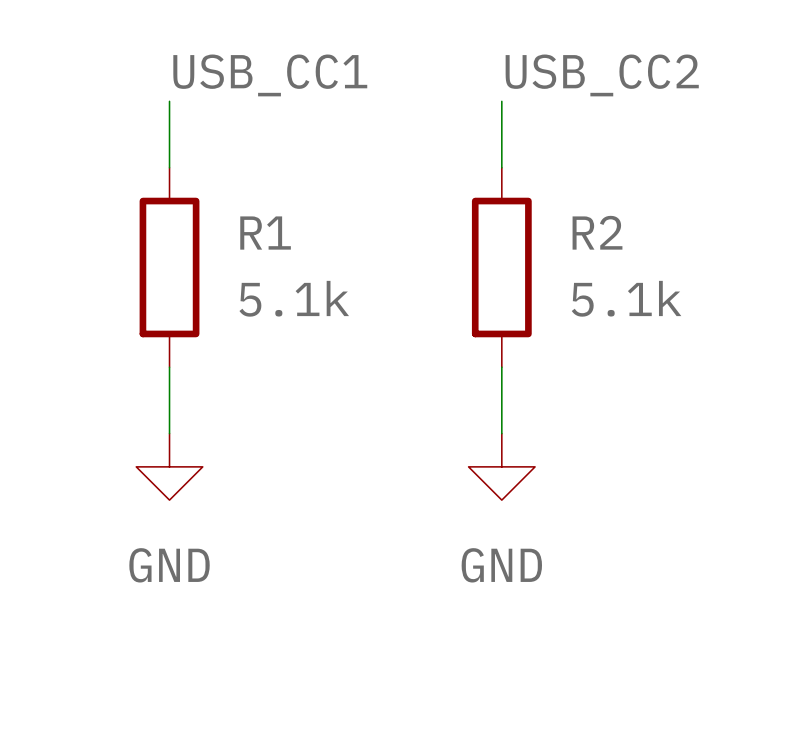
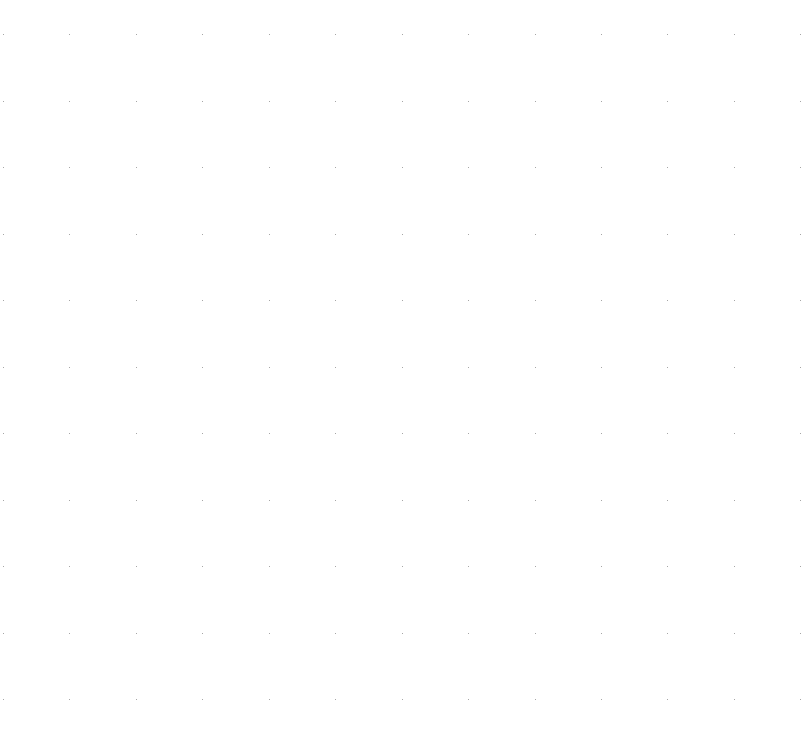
label: USB_CC1 (270, 75) -> none
label: USB_CC2 (602, 75) -> none
wire: (169, 101) (169, 167) -> none
wire: (501, 101) (501, 167) -> none
R1: 5.1k (169, 267) -> none
R2: 5.1k (501, 267) -> none
wire: (169, 367) (169, 433) -> none
wire: (501, 367) (501, 433) -> none
power symbol: GND (169, 466) -> none
power symbol: GND (501, 466) -> none

